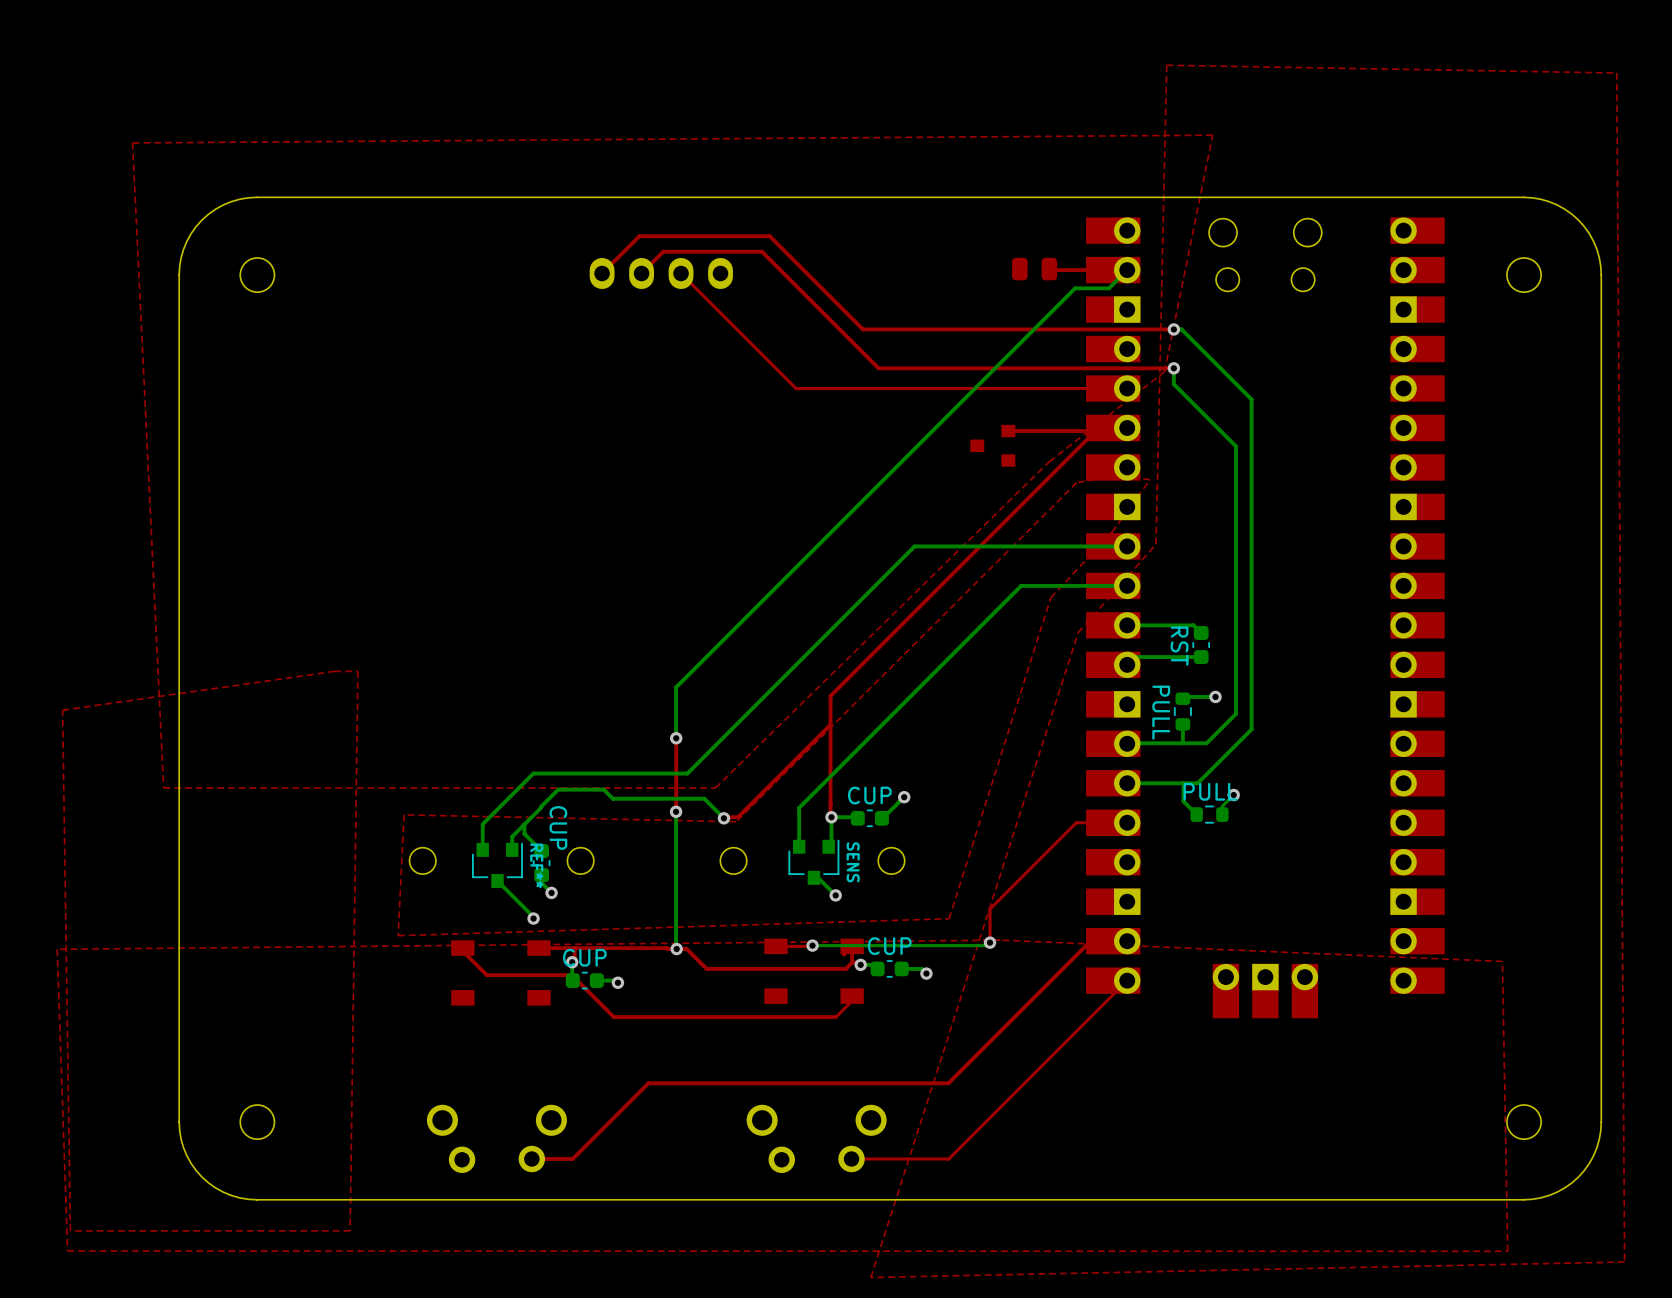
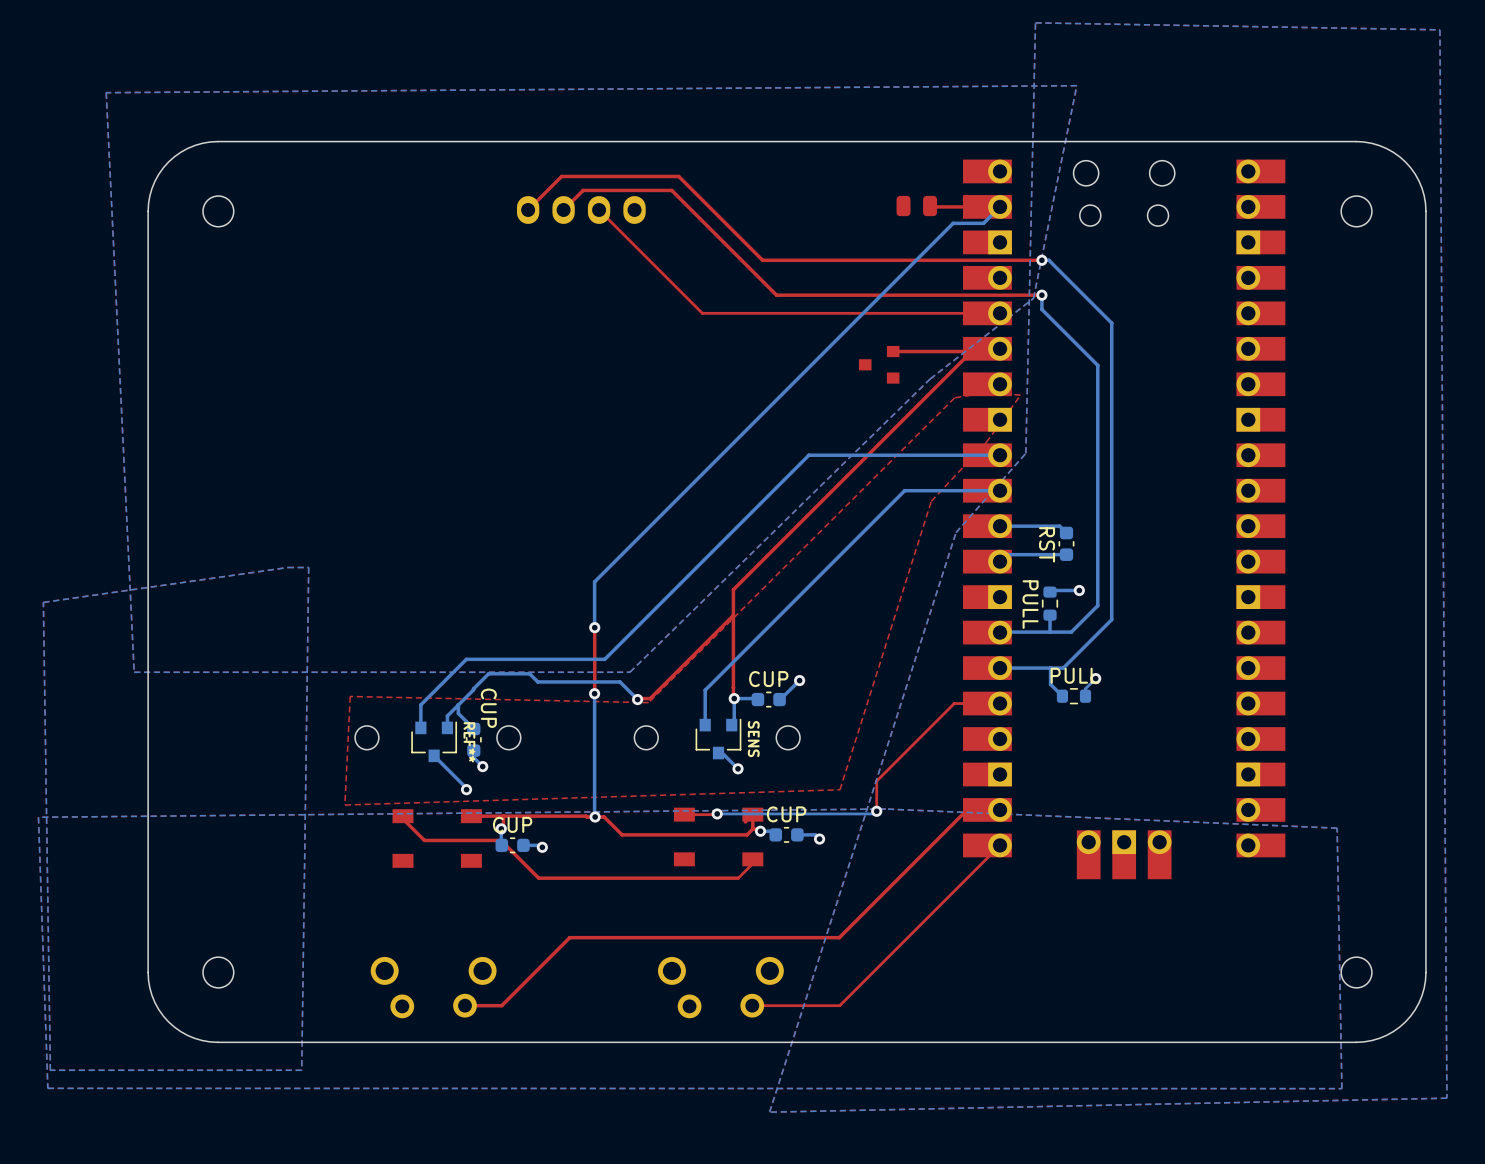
bottom zone outline: none -> (1035, 22) (1025, 453) (956, 532) (769, 1112) (1446, 1098) (1439, 29) (1035, 22)
bottom zone outline: none -> (1076, 85) (1033, 298) (930, 378) (629, 672) (134, 672) (106, 92) (1076, 85)
bottom zone outline: none -> (308, 567) (301, 1070) (50, 1070) (43, 602) (287, 567) (308, 567)
bottom zone outline: none -> (885, 809) (38, 817) (47, 1088) (1341, 1088) (1337, 828) (885, 809)

